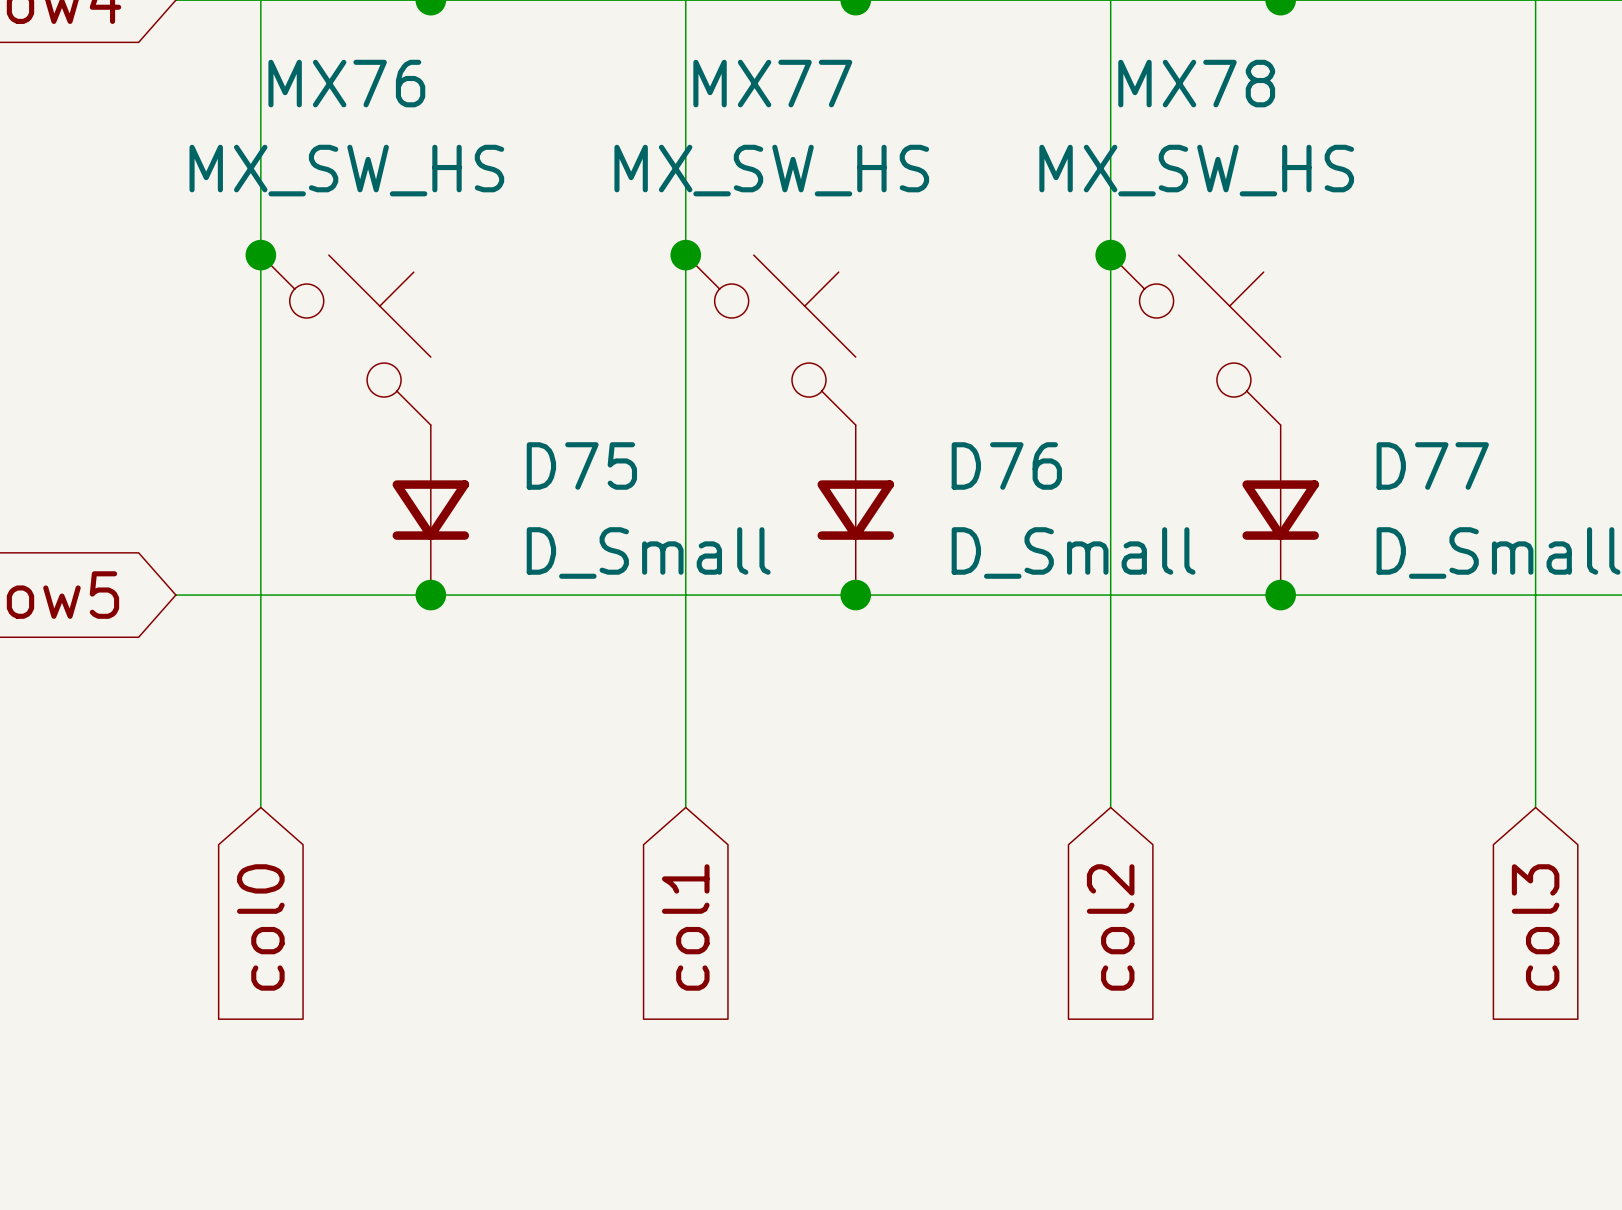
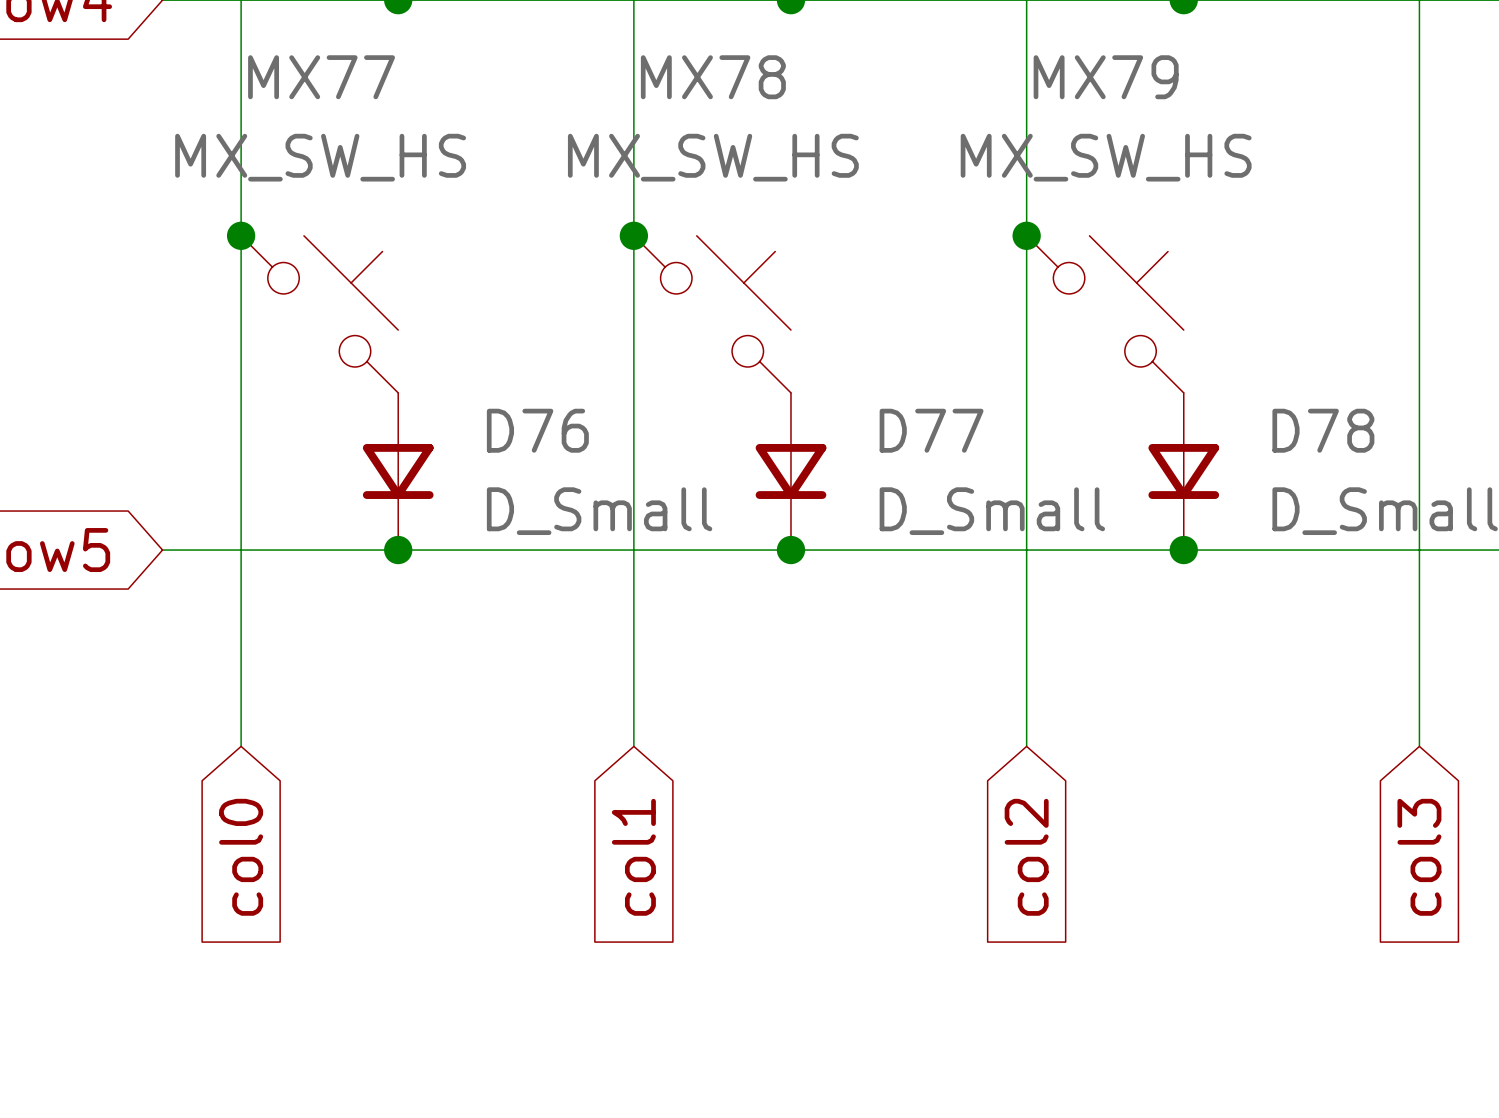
MX76 name: MX76 (346, 83) -> MX77 (321, 77)
MX77 name: MX77 (772, 83) -> MX78 (713, 77)
MX78 name: MX78 (1196, 83) -> MX79 (1106, 77)
D75 name: D75 (581, 465) -> D76 (537, 430)
D76 name: D76 (1006, 465) -> D77 (931, 430)
D77 name: D77 (1432, 465) -> D78 (1323, 430)

